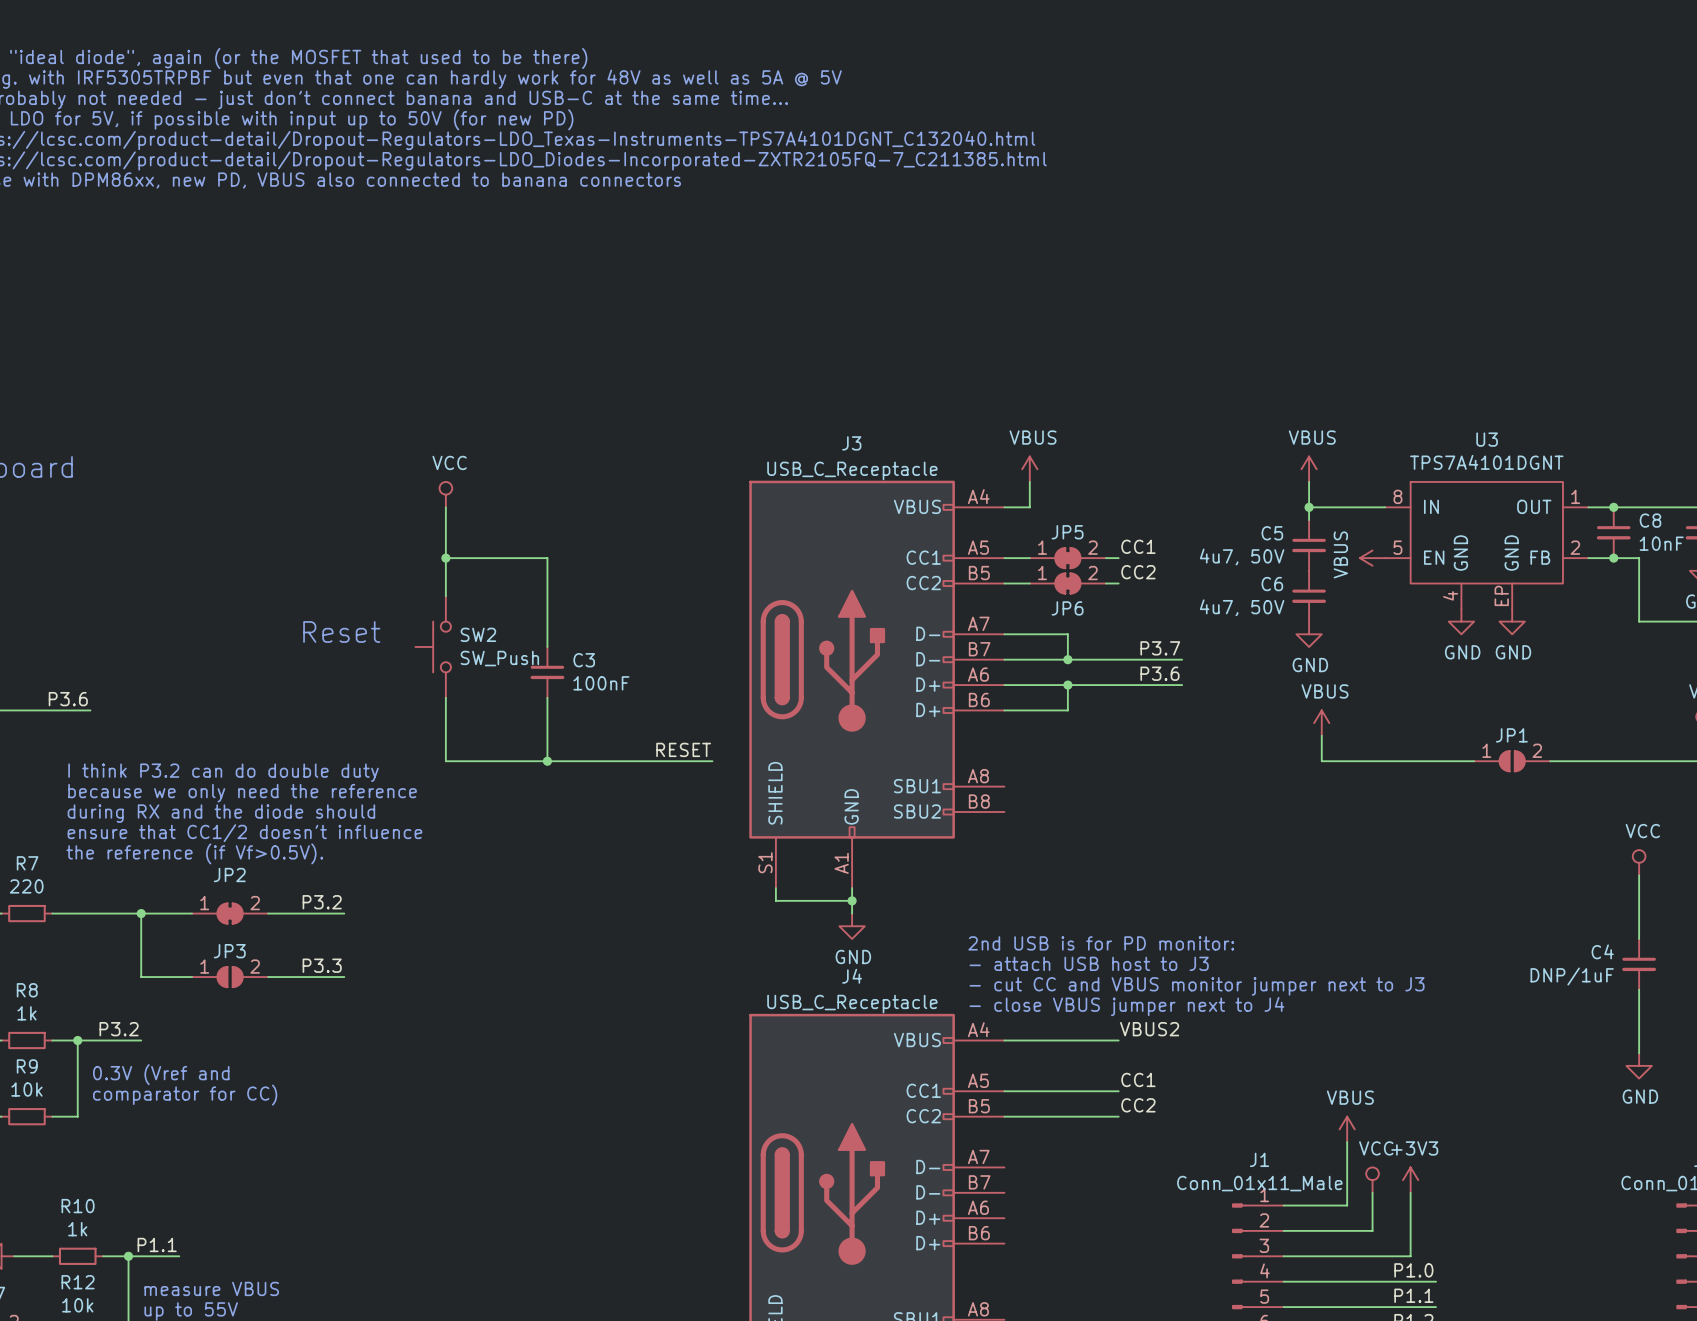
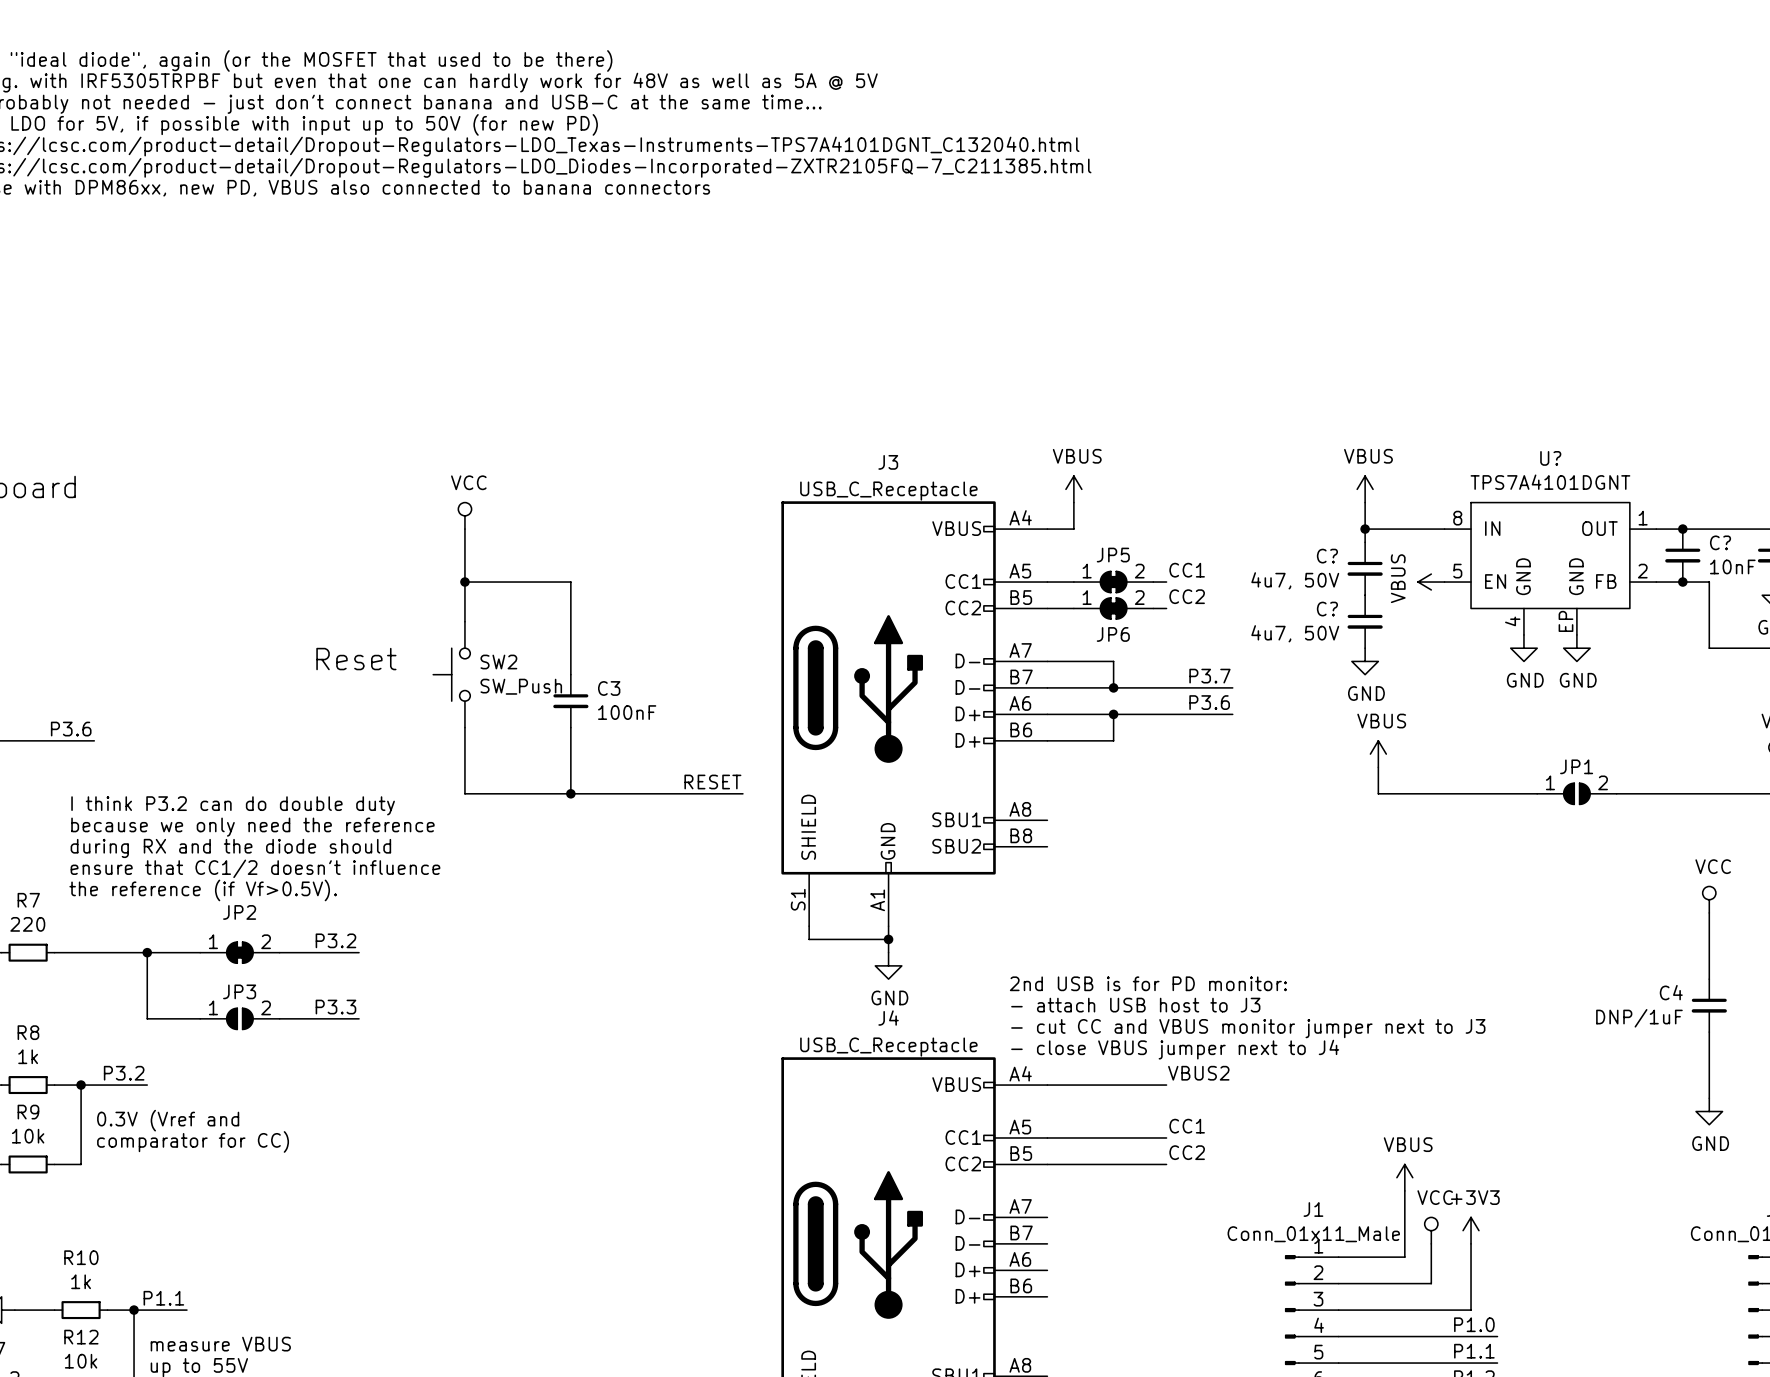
U3 name: U3 (1487, 439) -> U? (1550, 458)
C8 name: C8 (1650, 520) -> C? (1720, 542)
C5 name: C5 (1272, 533) -> C? (1327, 556)
C6 name: C6 (1272, 584) -> C? (1327, 609)

